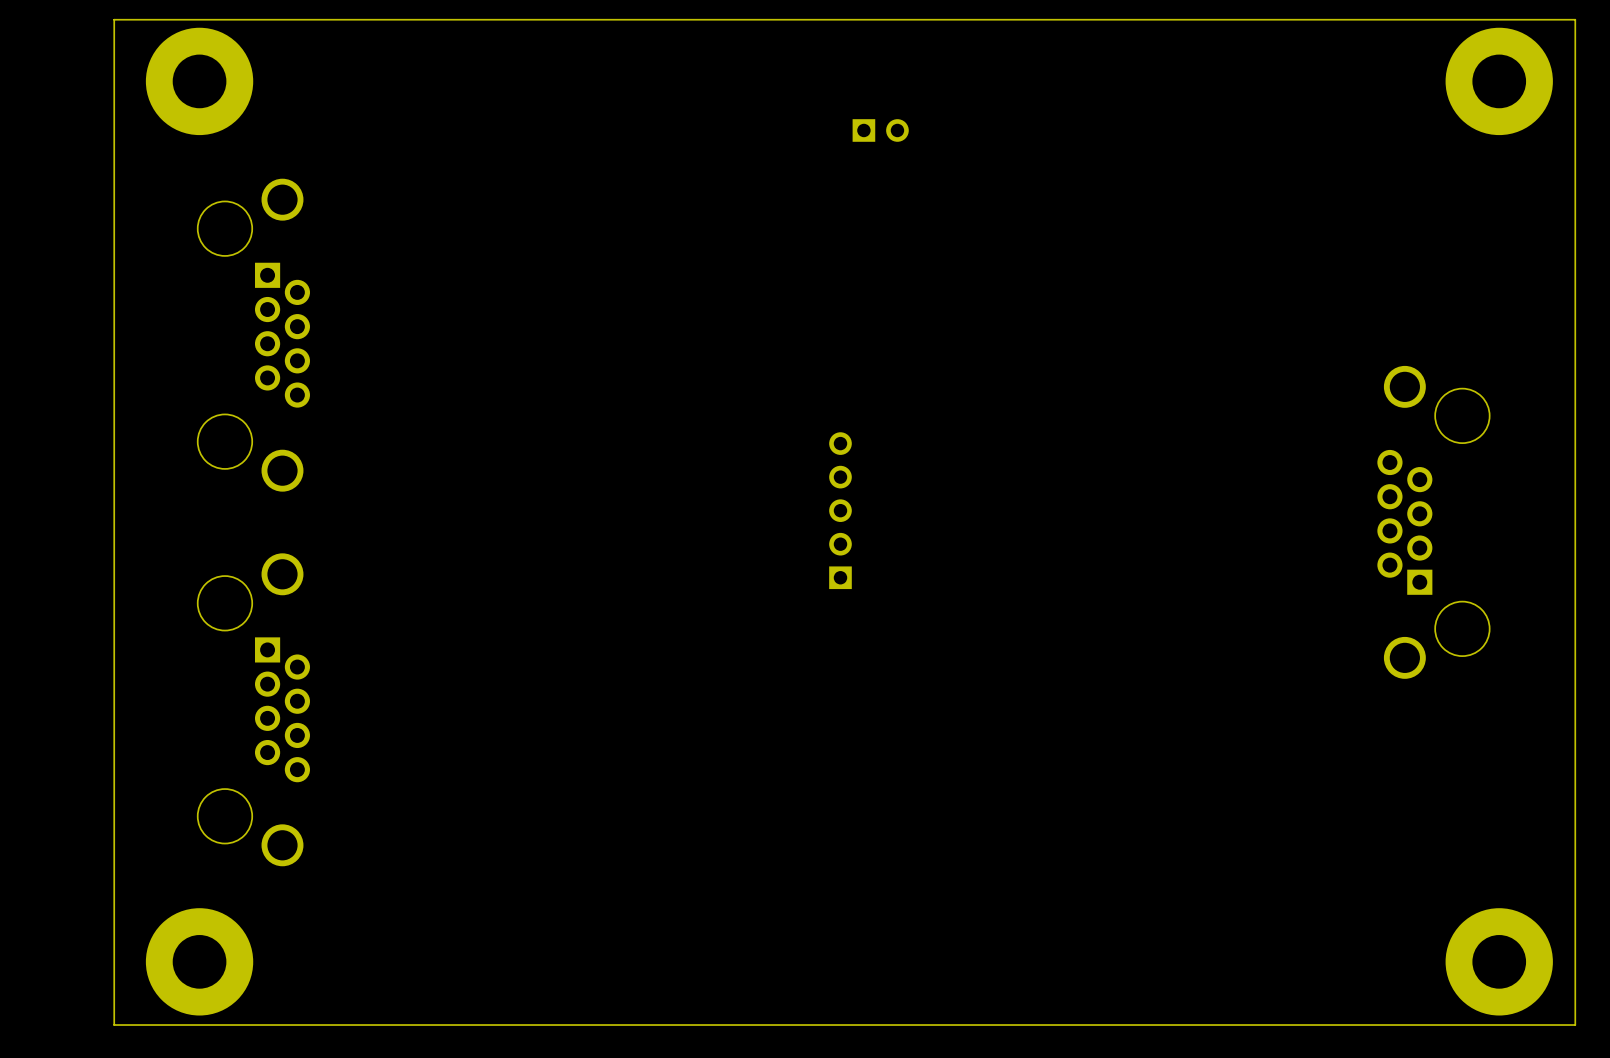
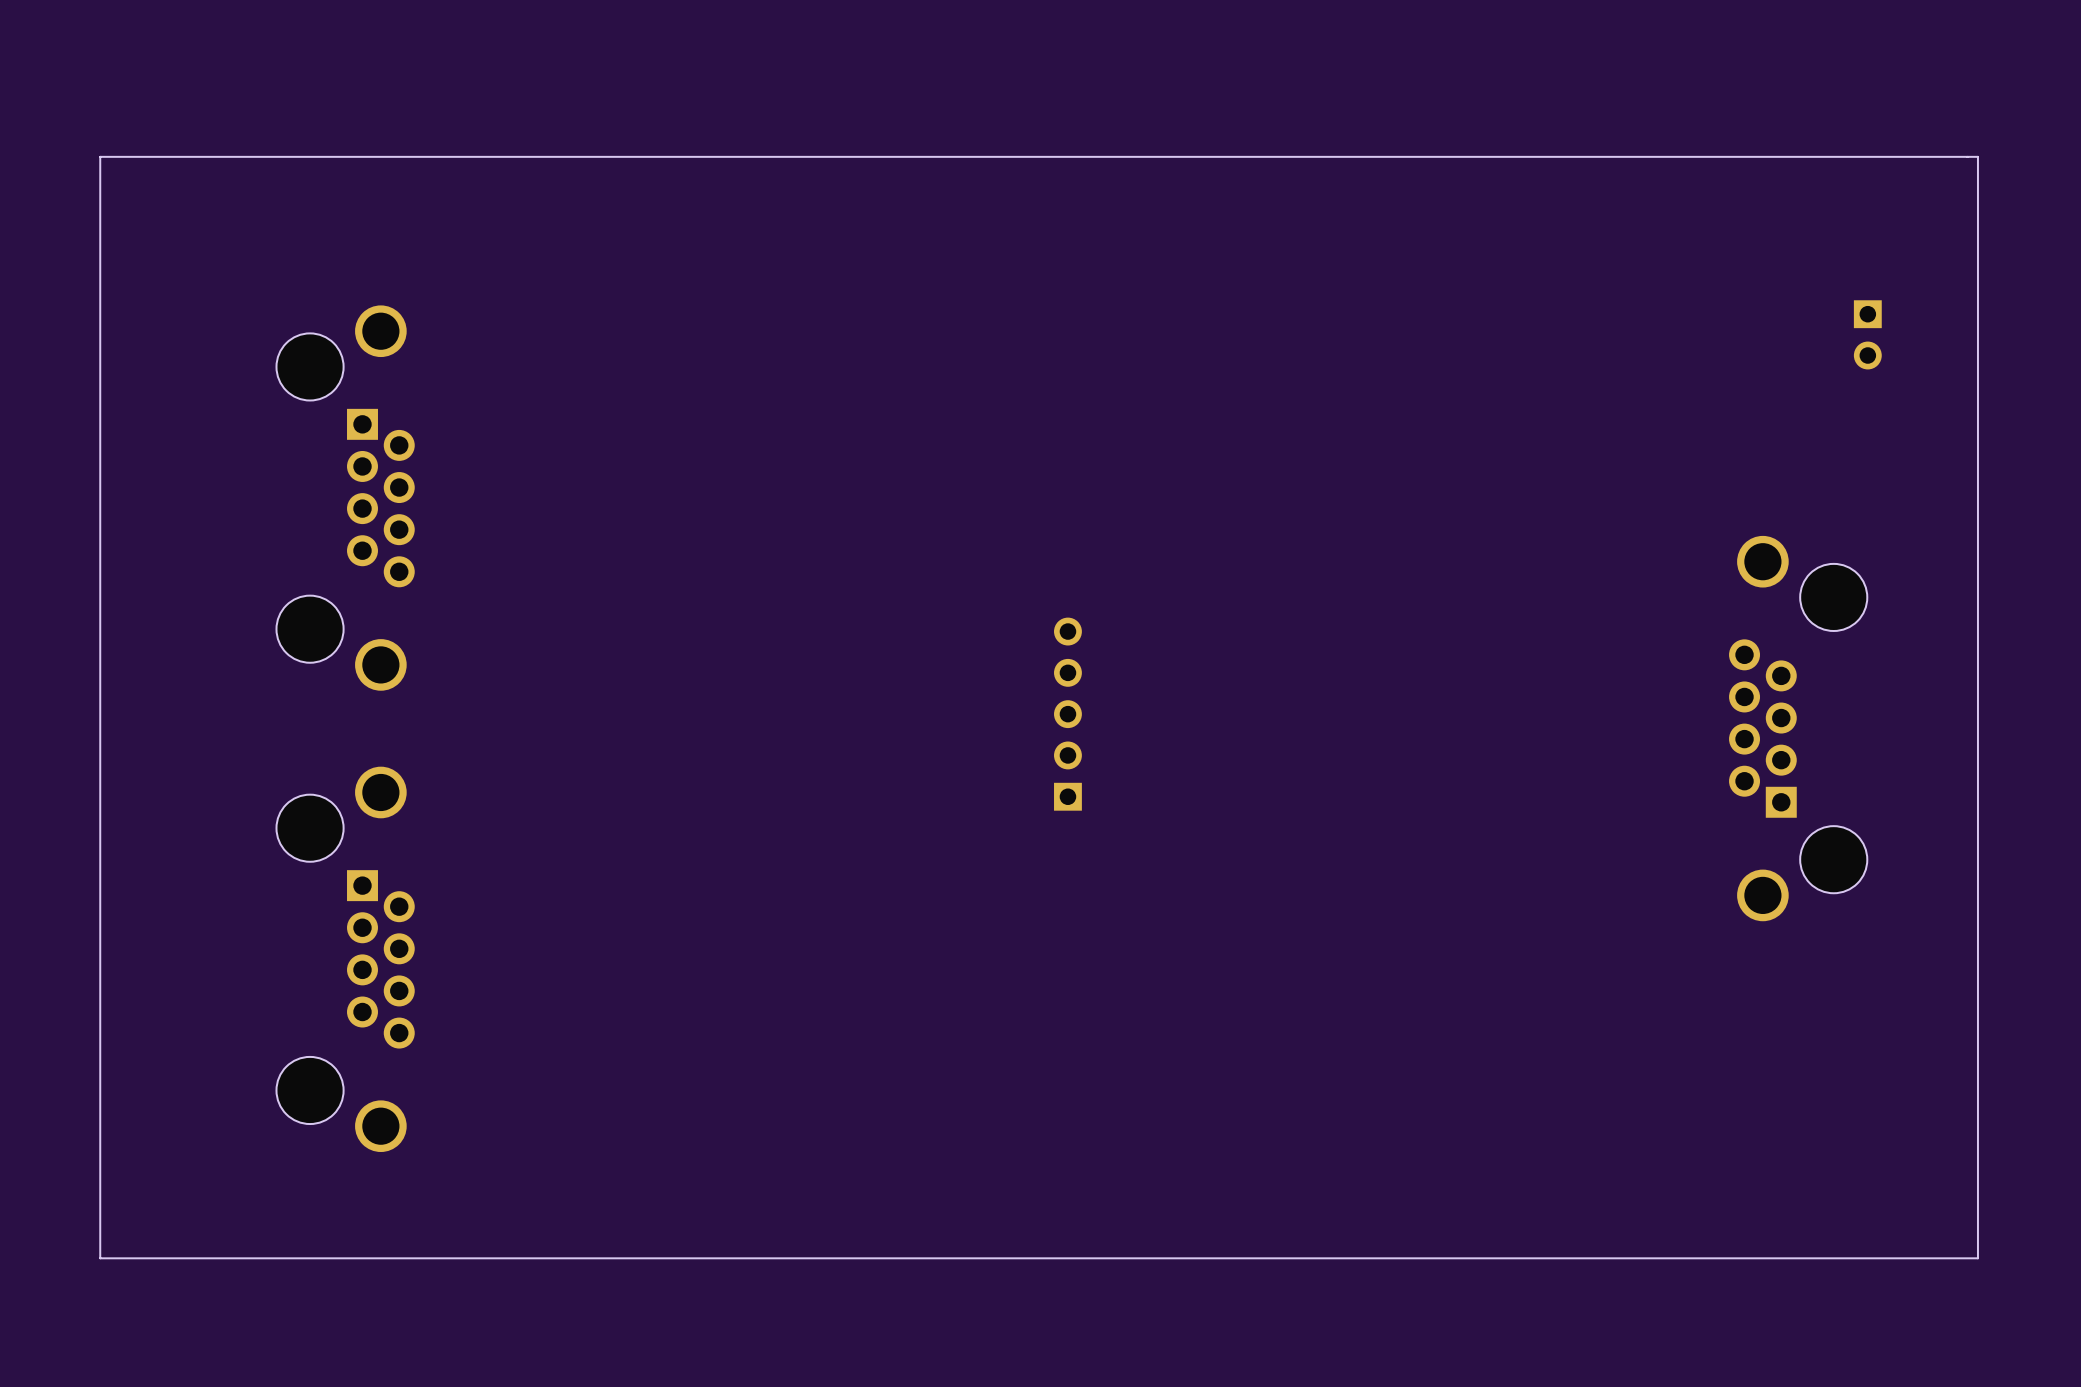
board edge: (1575, 19) (1575, 1025) (114, 1025) (114, 19) (1575, 19) -> (1977, 156) (1977, 1258) (100, 1258) (100, 156) (1977, 156)
part: (199, 81) -> none
part: (1499, 81) -> none
part: (880, 130) -> none
part: none -> (1867, 334)
part: (199, 961) -> none
part: (1499, 961) -> none

